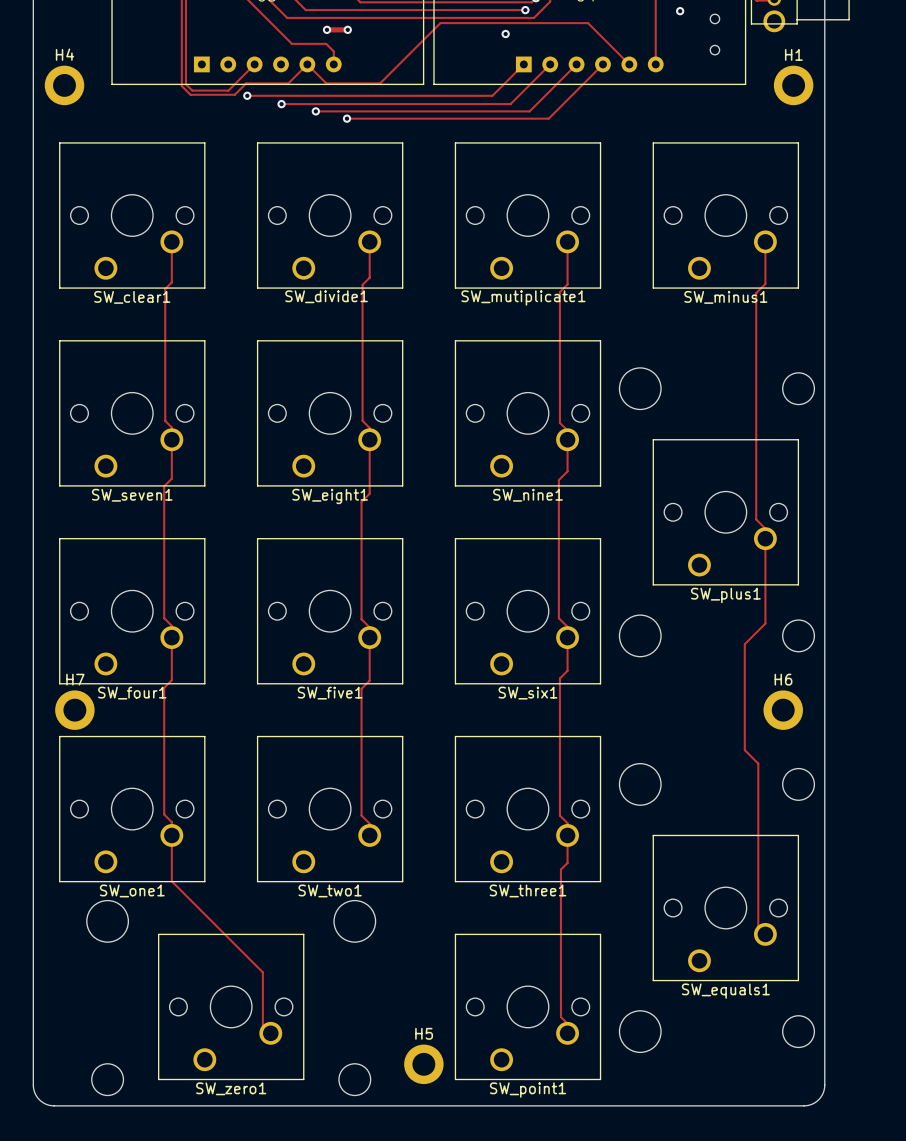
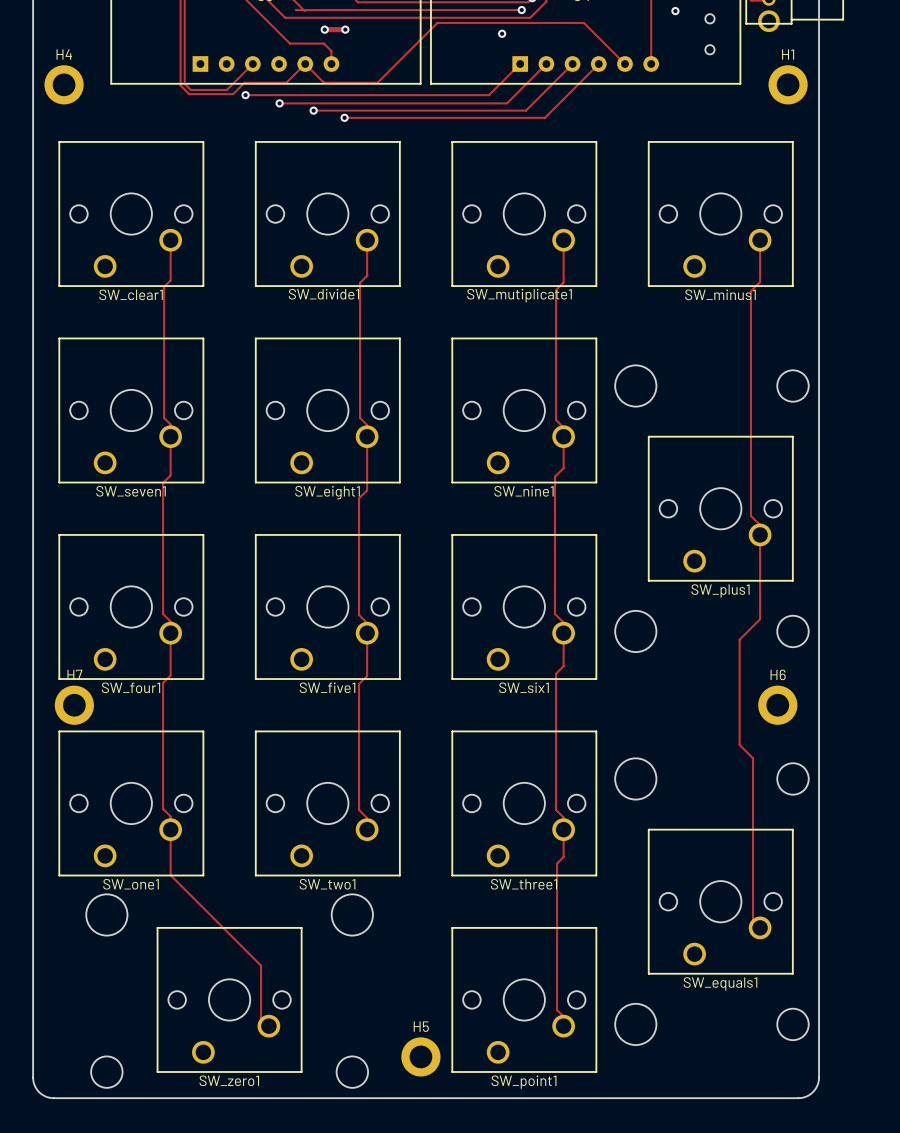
track: none -> (295, 10) (304, 11)

